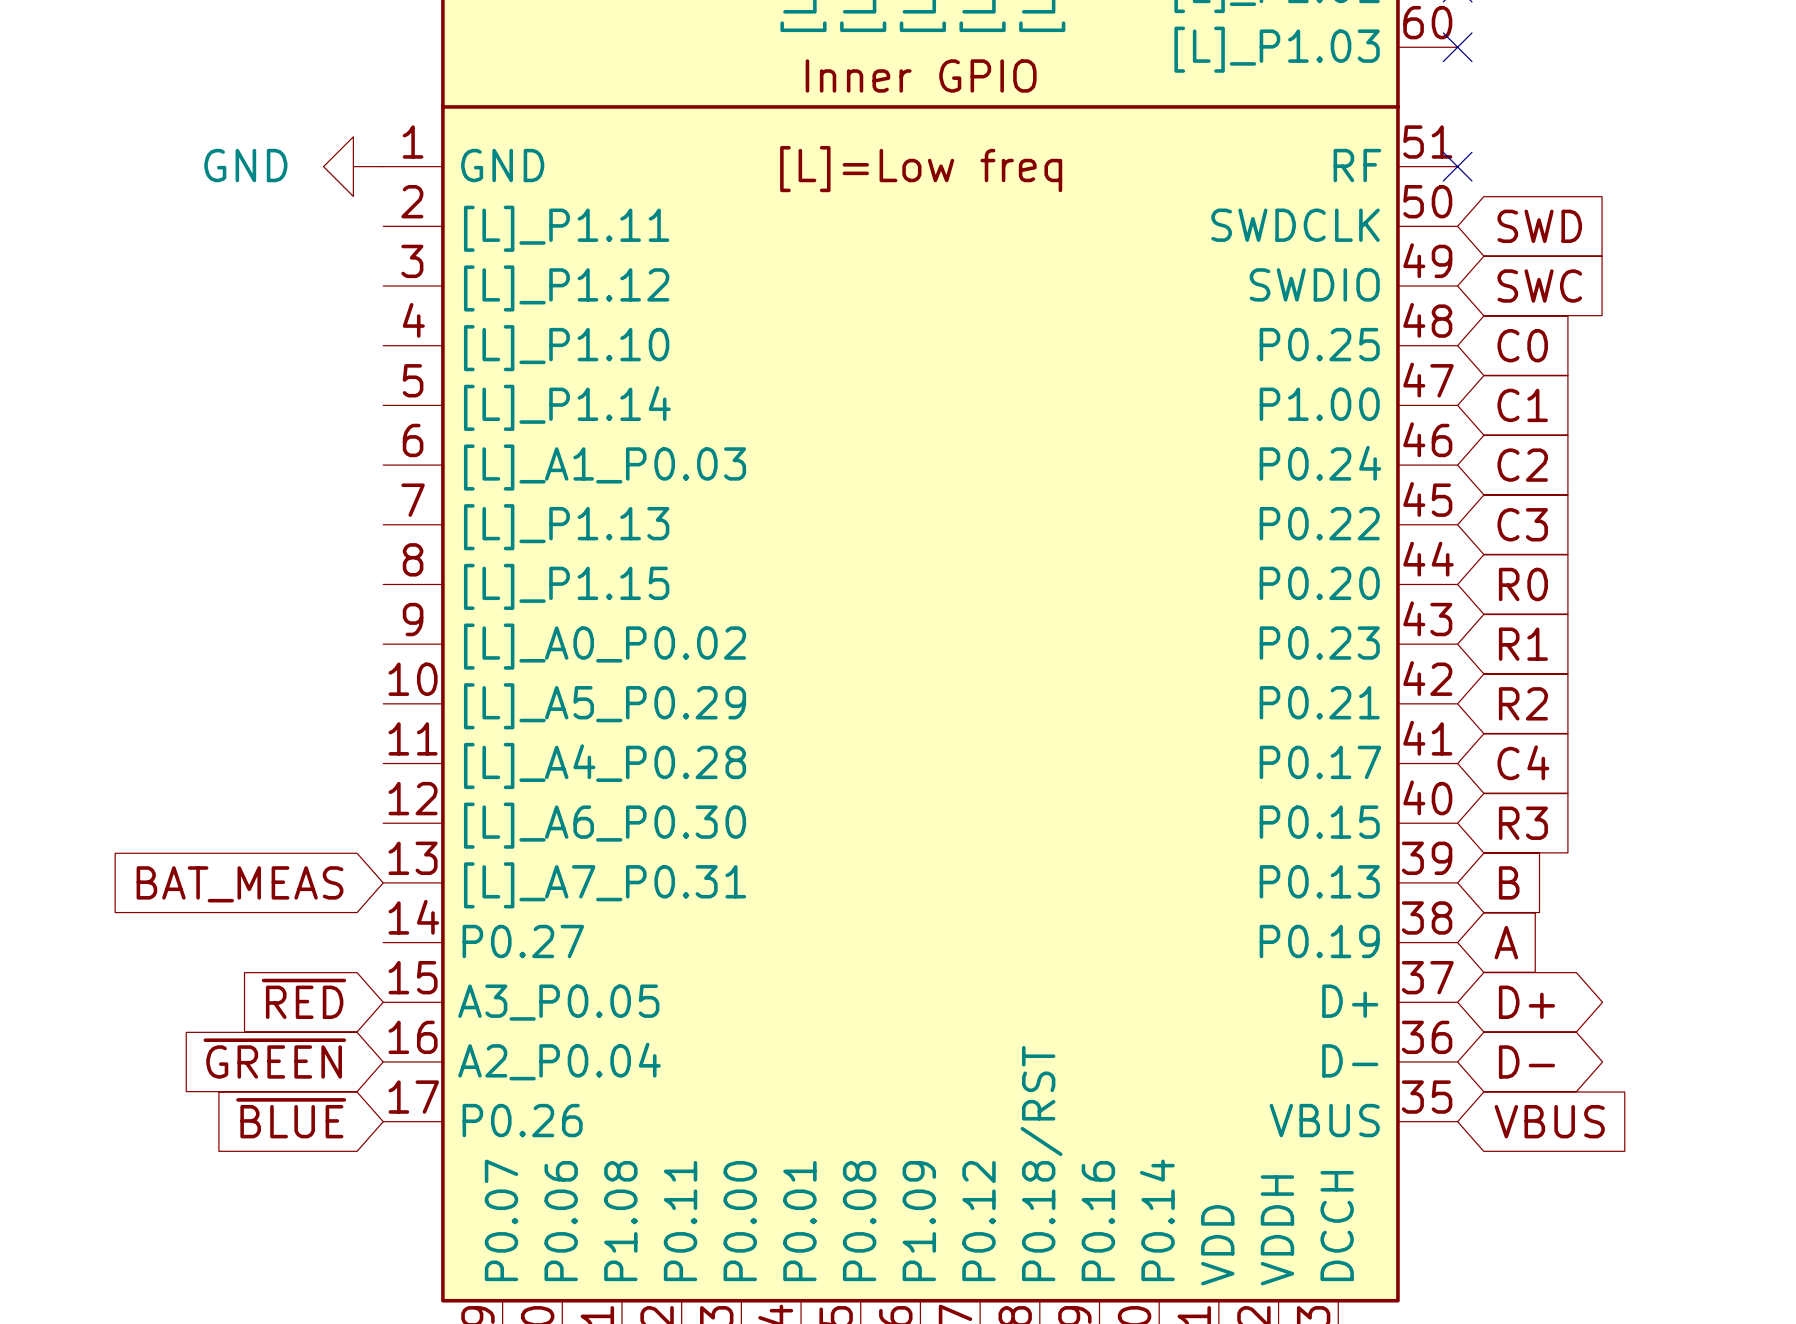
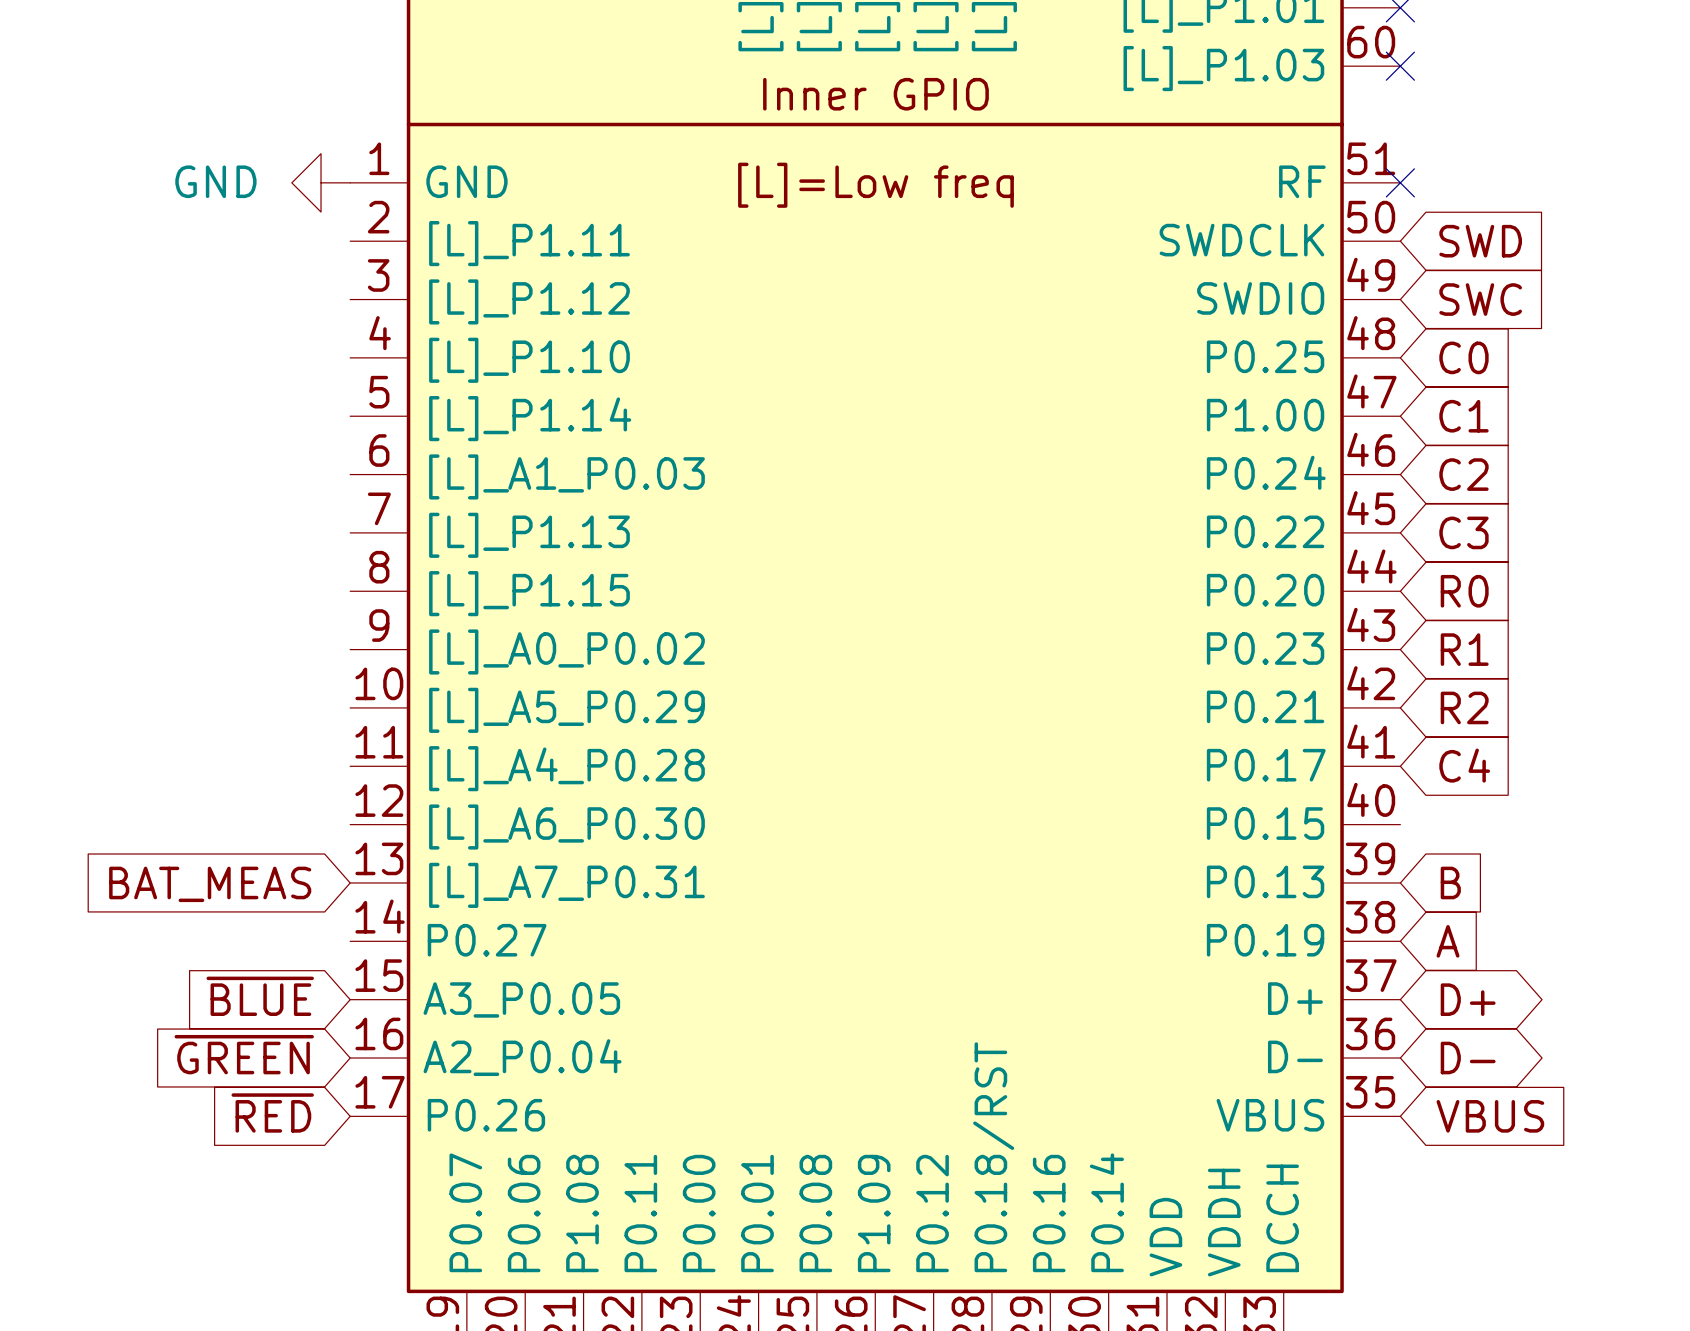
global label: R3 (1523, 823) -> none
global label: ~{RED} (303, 998) -> ~{BLUE} (260, 996)
global label: ~{BLUE} (291, 1118) -> ~{RED} (272, 1113)

